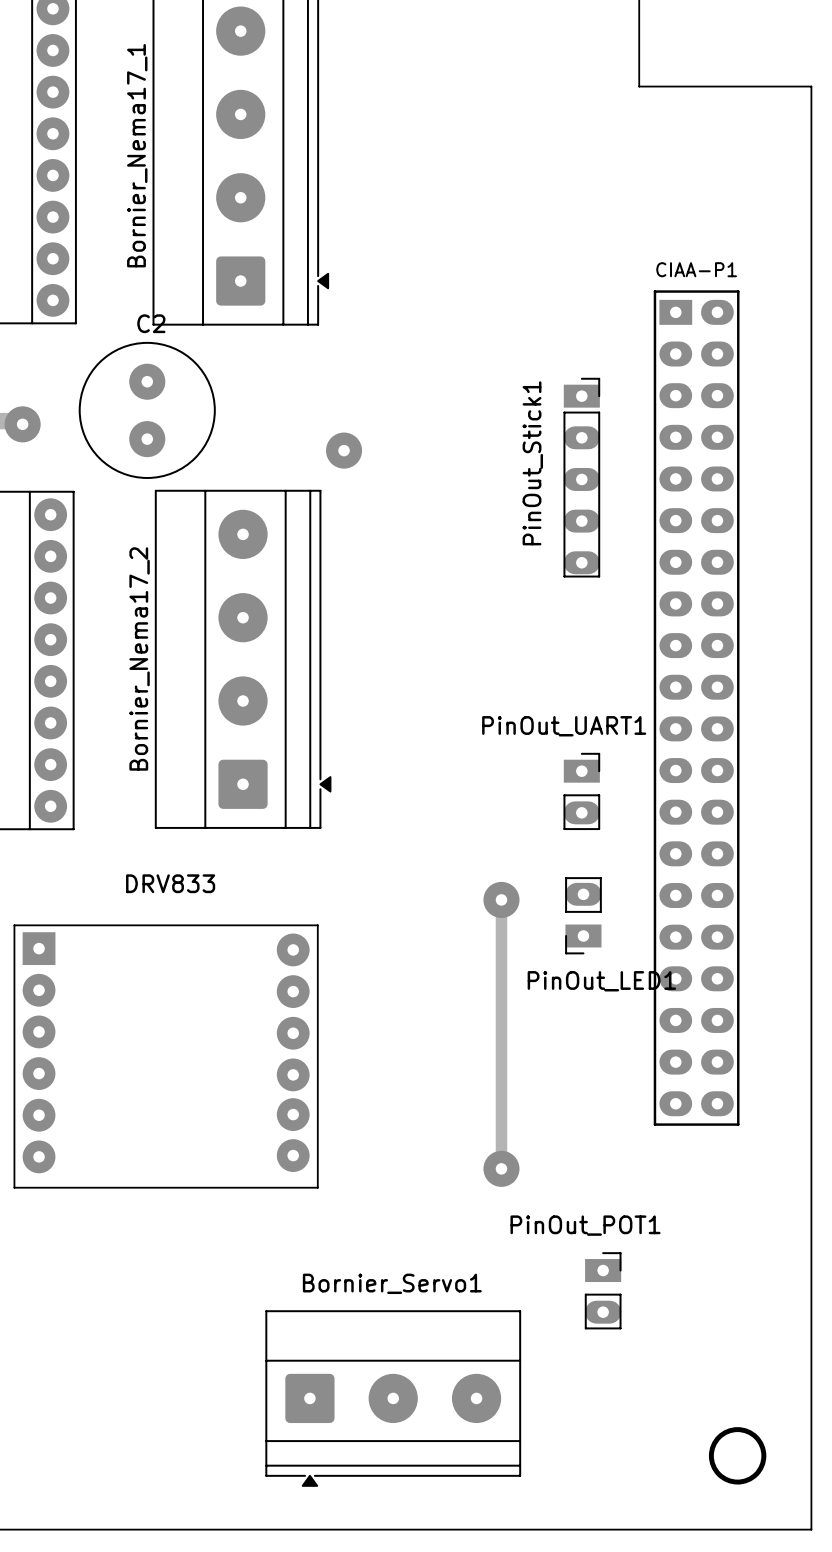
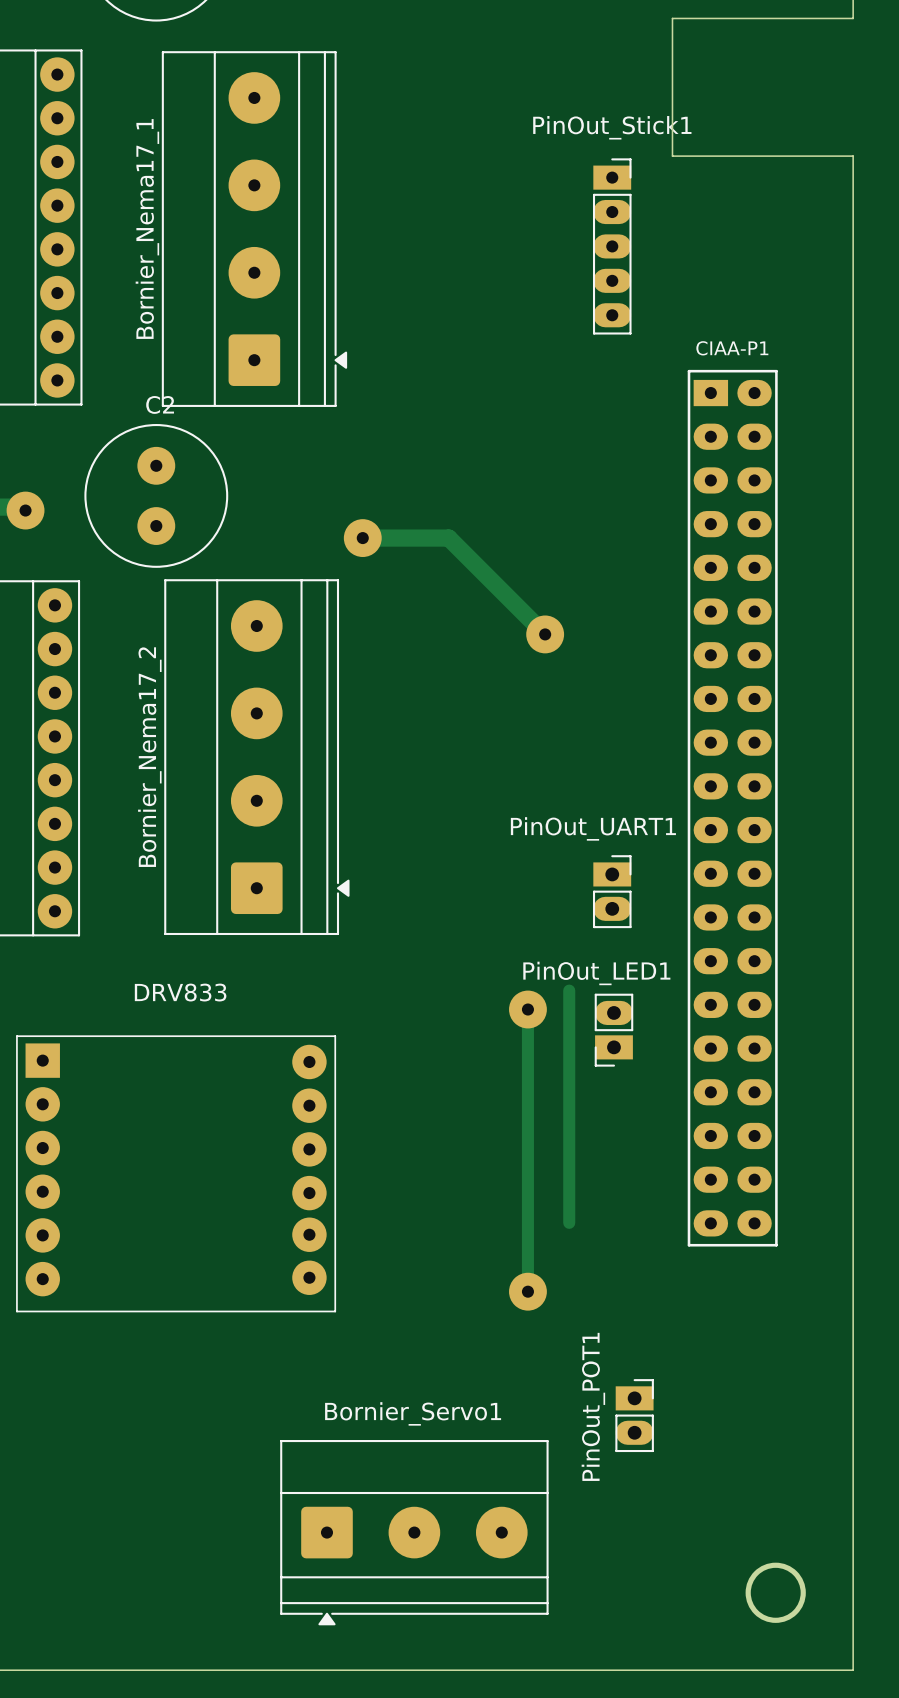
PinOut_Stick1 footprint: [563, 377, 601, 578] -> [592, 158, 632, 335]
track: none -> (362, 538) (448, 538) (545, 634)
PinOut_Stick1 name position: PinOut_Stick1 (532, 463) -> PinOut_Stick1 (612, 127)
part: none -> (545, 634)
PinOut_UART1 footprint: [563, 752, 601, 831] -> [592, 855, 632, 929]
PinOut_LED1 footprint: [565, 877, 602, 955] -> [594, 993, 634, 1067]
track: none -> (569, 990) (569, 1222)
PinOut_LED1 name position: PinOut_LED1 (601, 981) -> PinOut_LED1 (596, 973)
PinOut_POT1 name rotation: 0° (585, 1225) -> 90° counterclockwise (593, 1406)
PinOut_POT1 footprint: [584, 1252, 622, 1330] -> [615, 1379, 654, 1453]

